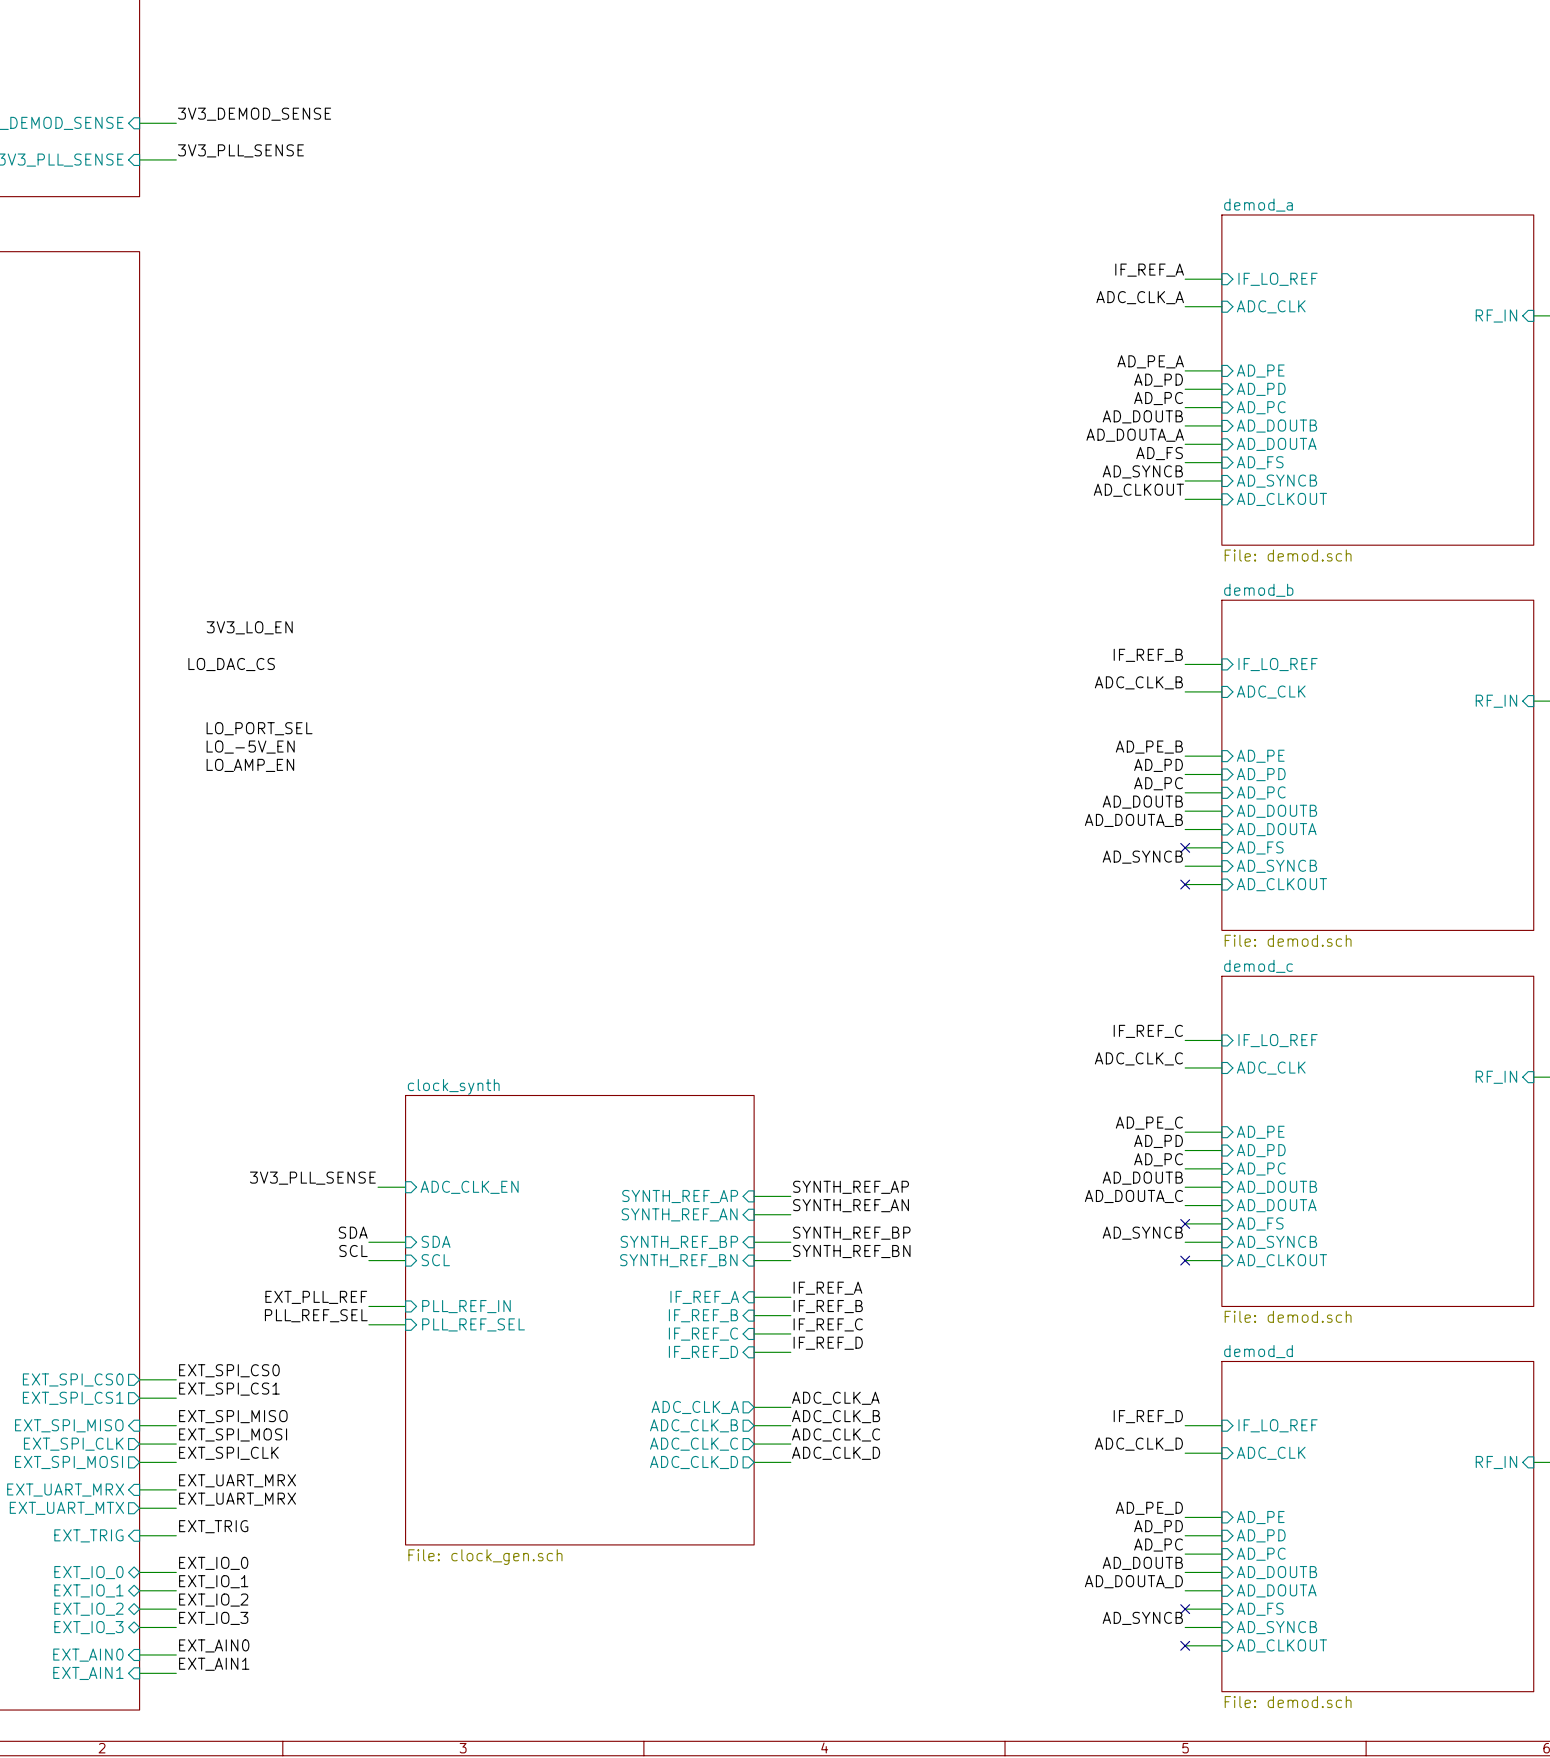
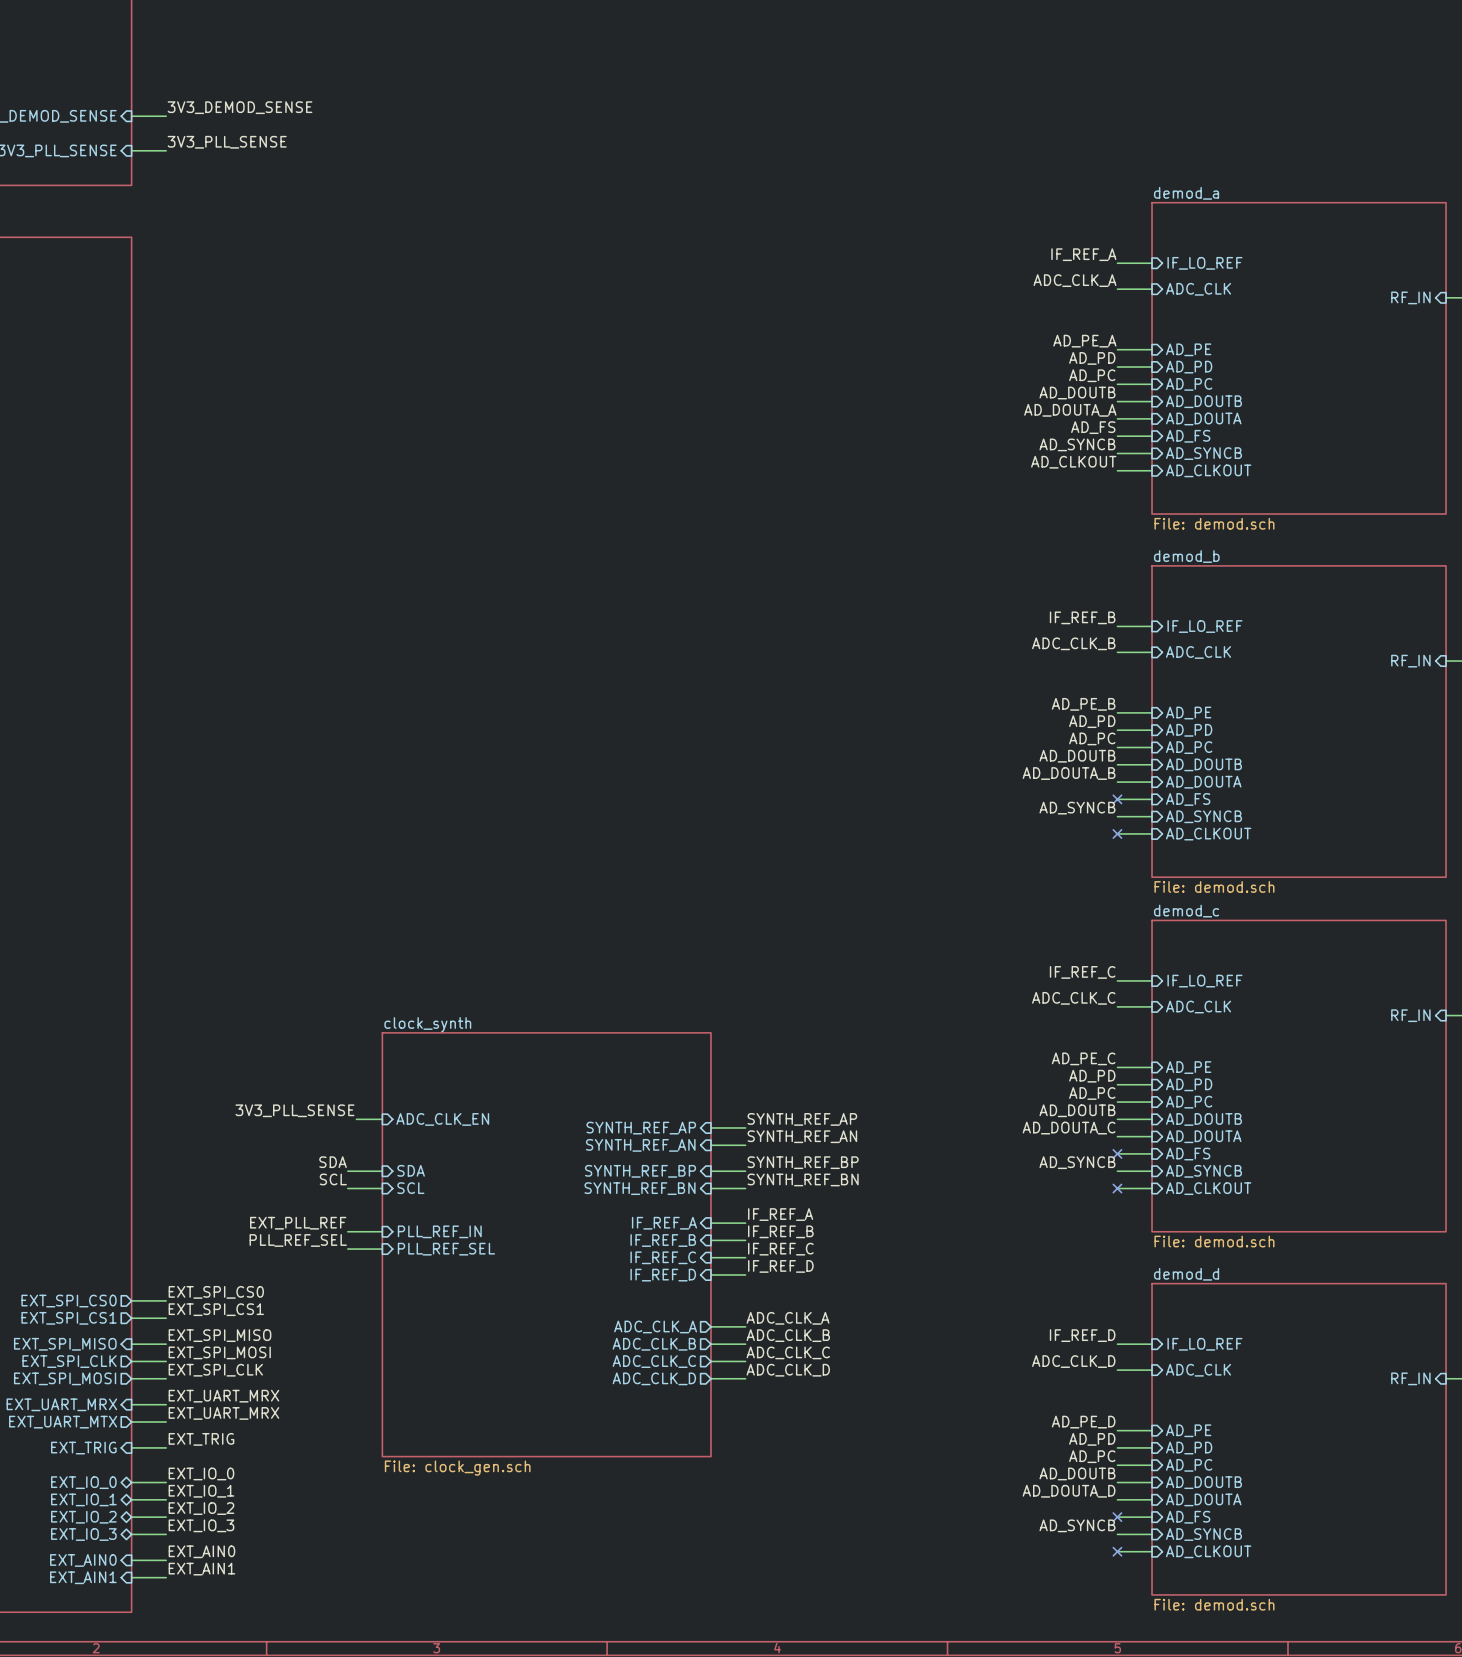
label: 3V3_LO_EN (249, 627) -> none
label: LO_DAC_CS (231, 664) -> none
label: LO_PORT_SEL (259, 728) -> none
label: LO_-5V_EN (250, 747) -> none
label: LO_AMP_EN (250, 765) -> none

